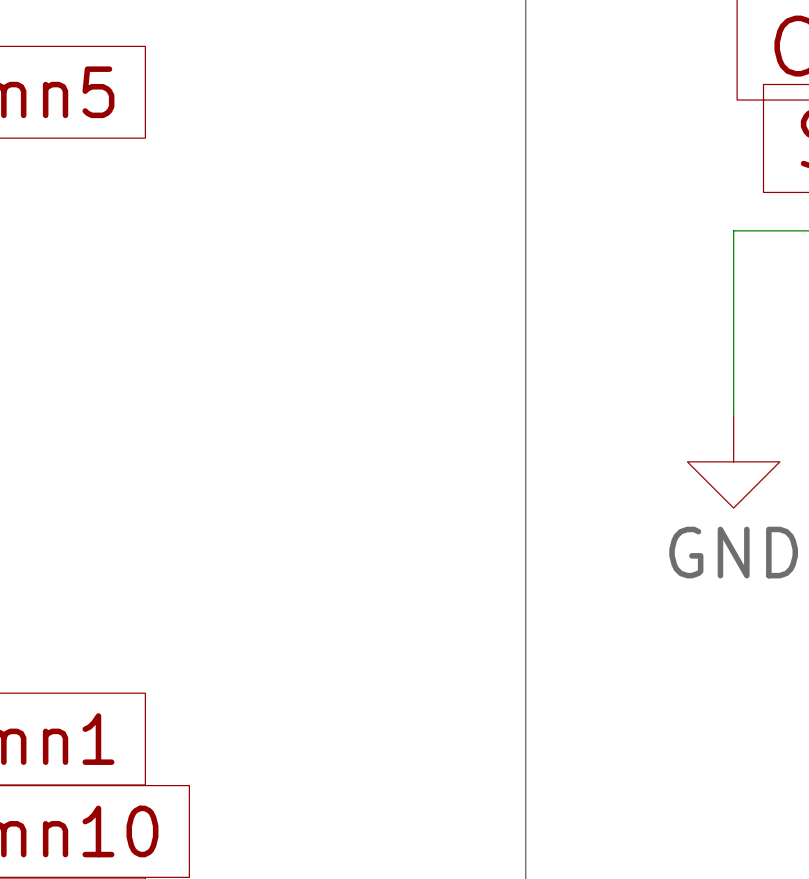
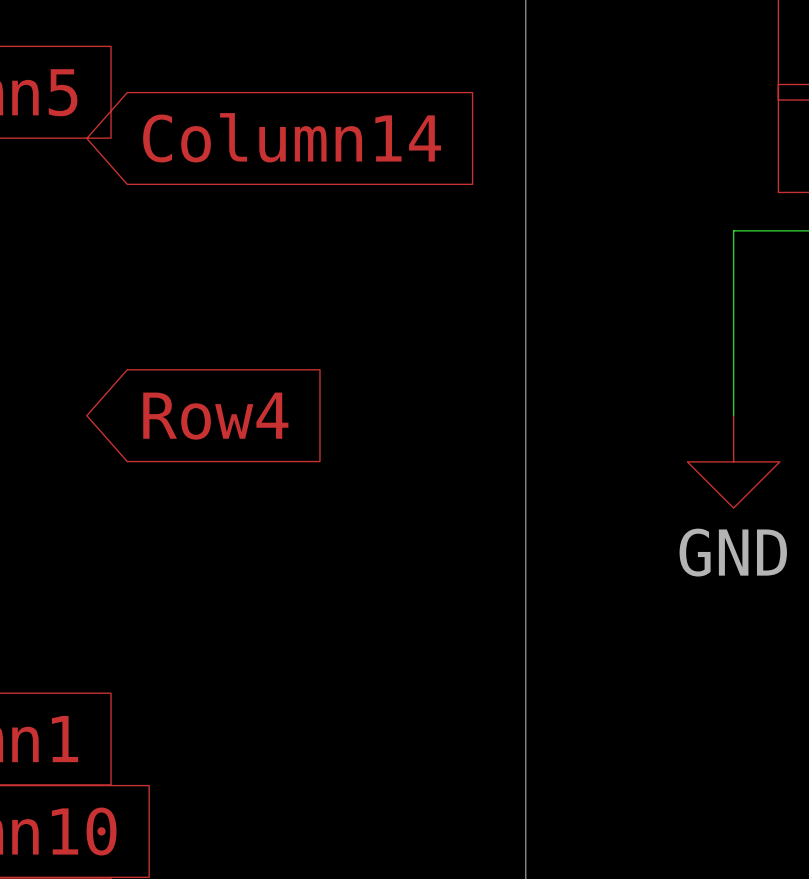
global label: none -> Column14 (292, 137)
global label: none -> Row4 (215, 416)

